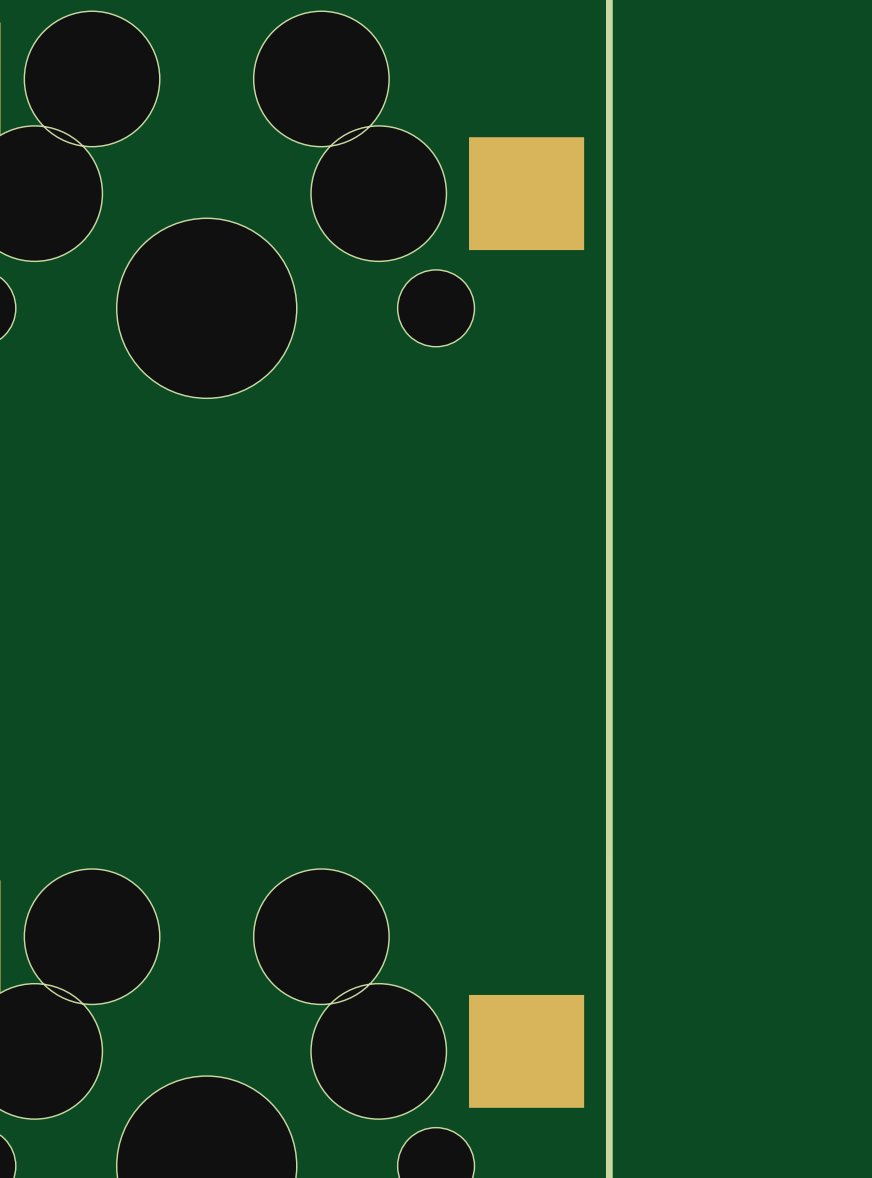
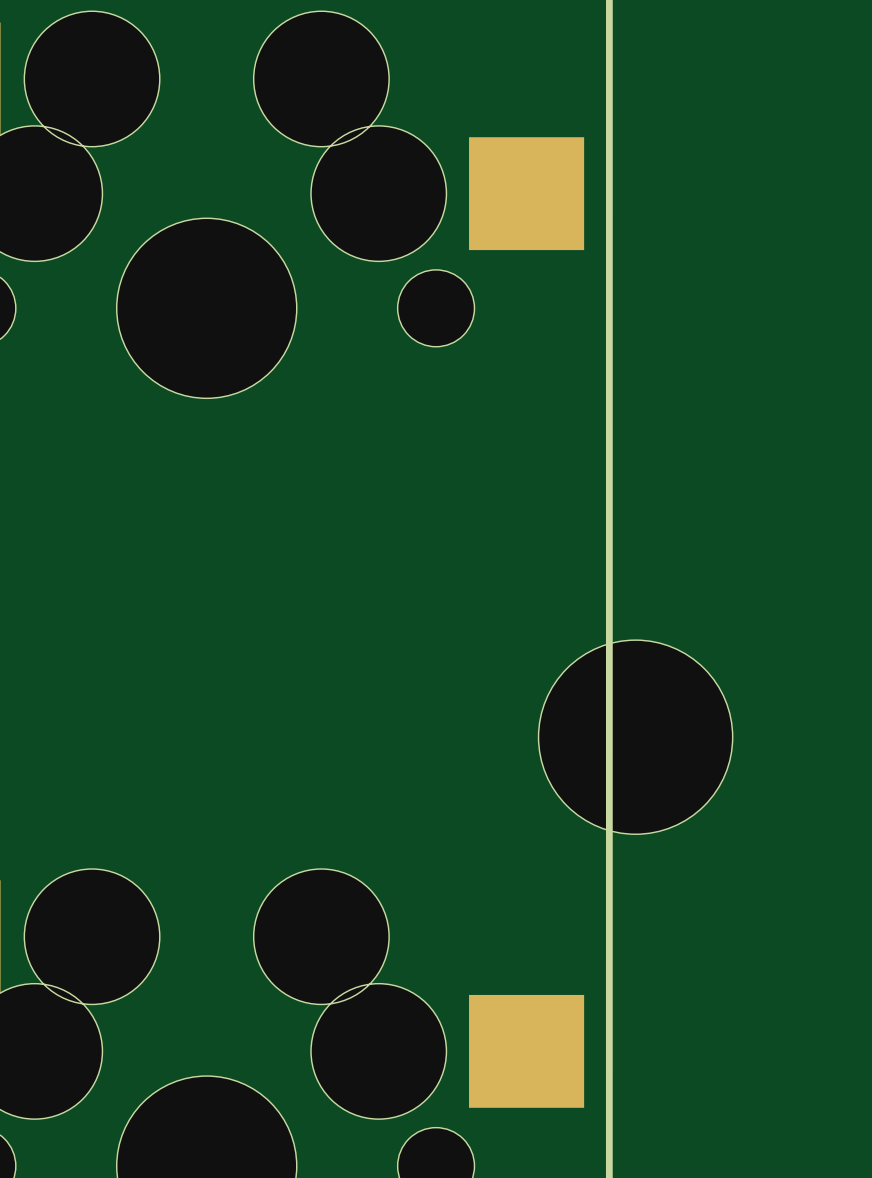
part: none -> (635, 737)

